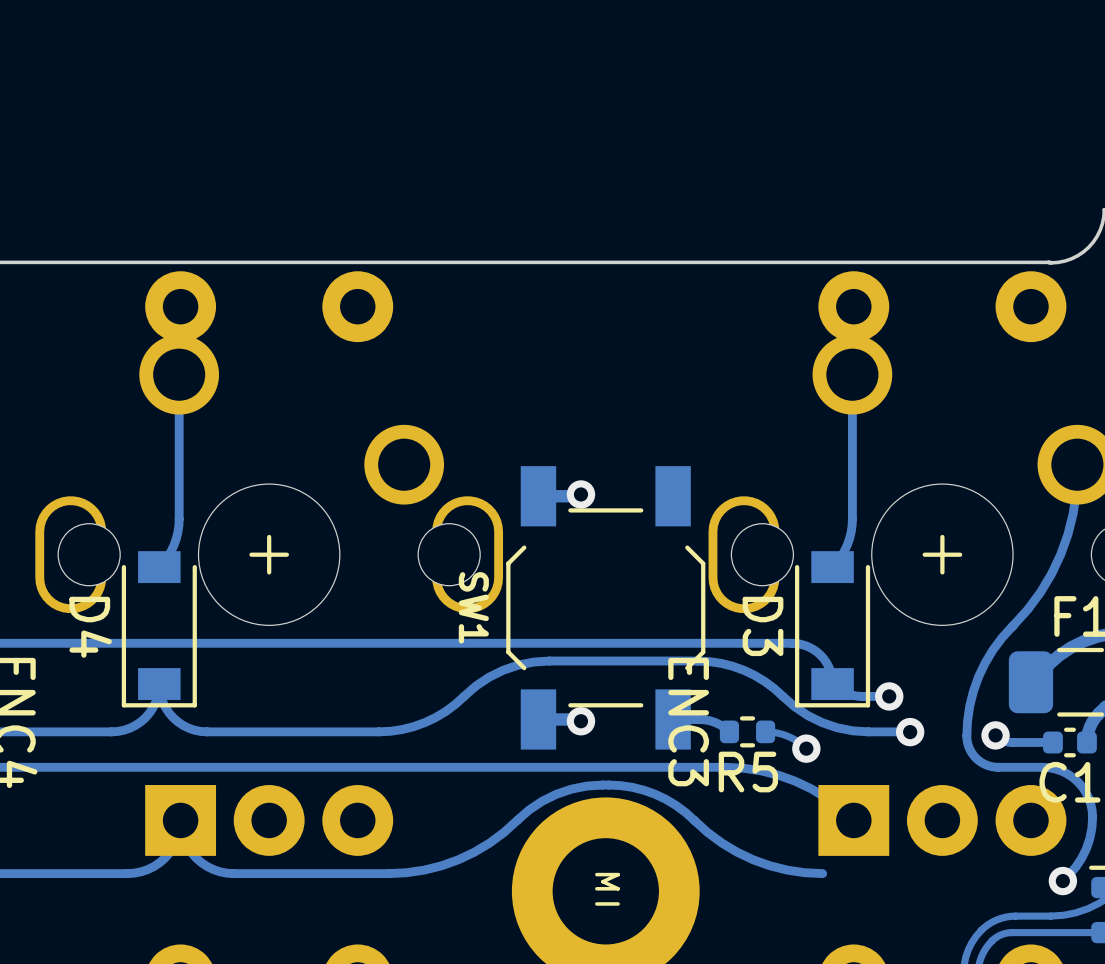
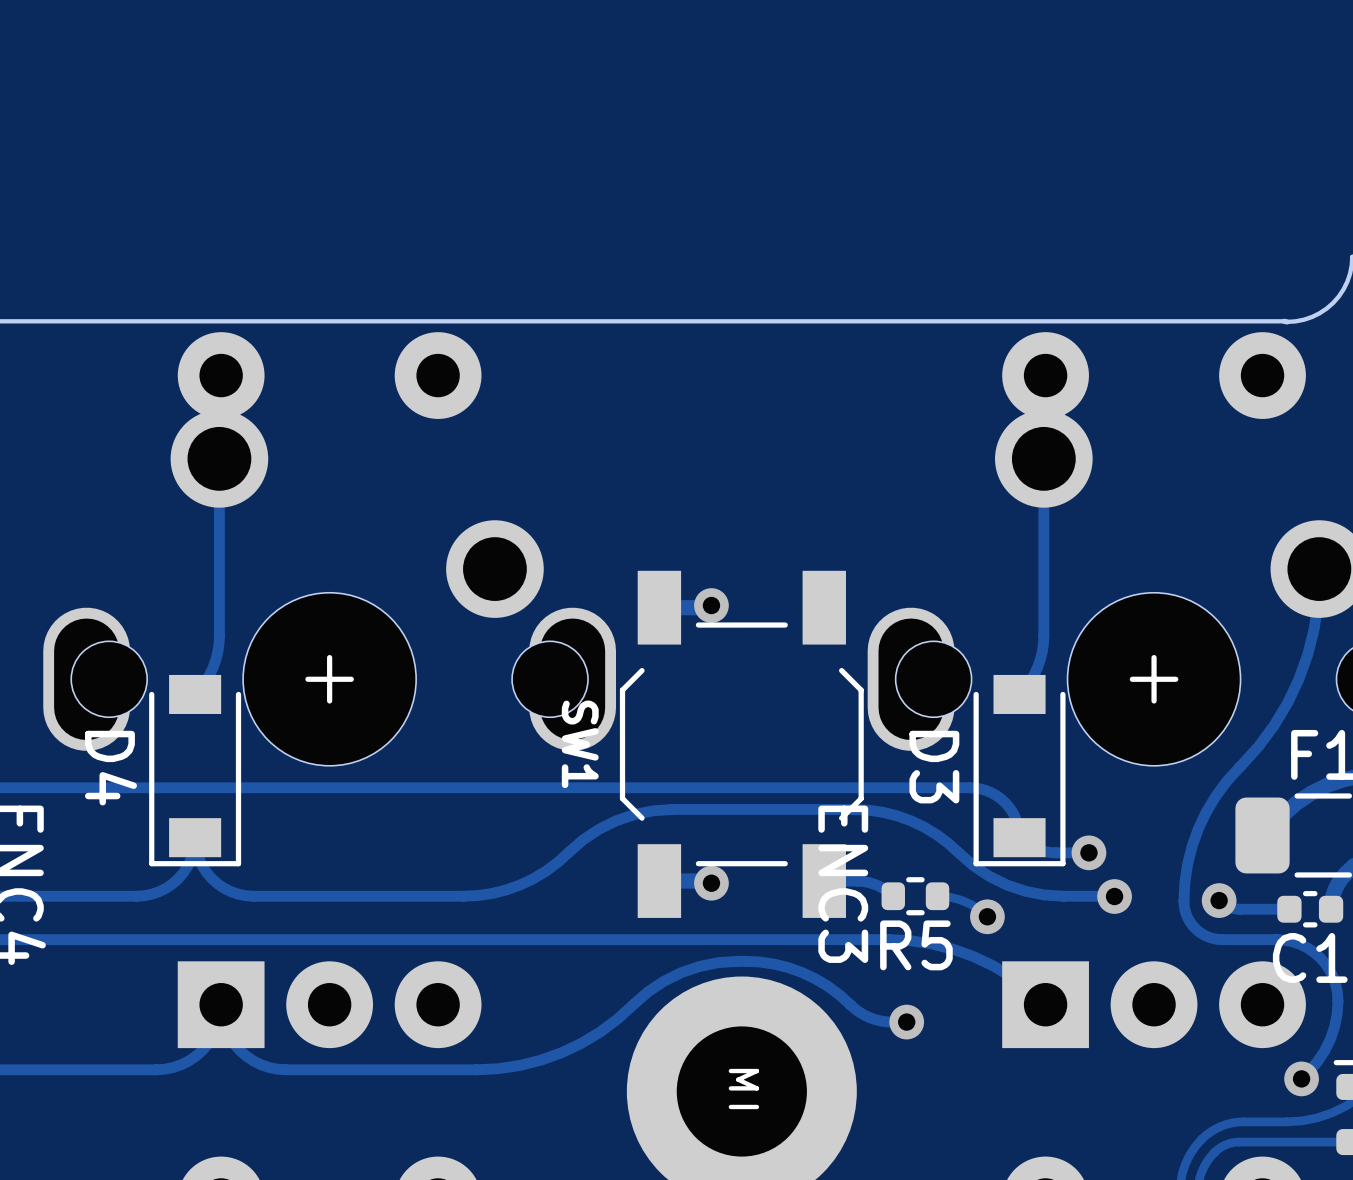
track: (694, 820) (721, 843) (753, 859) (787, 870) (822, 873) -> (850, 1004) (864, 1015) (875, 1019) (906, 1022)
via: none -> (906, 1022)

